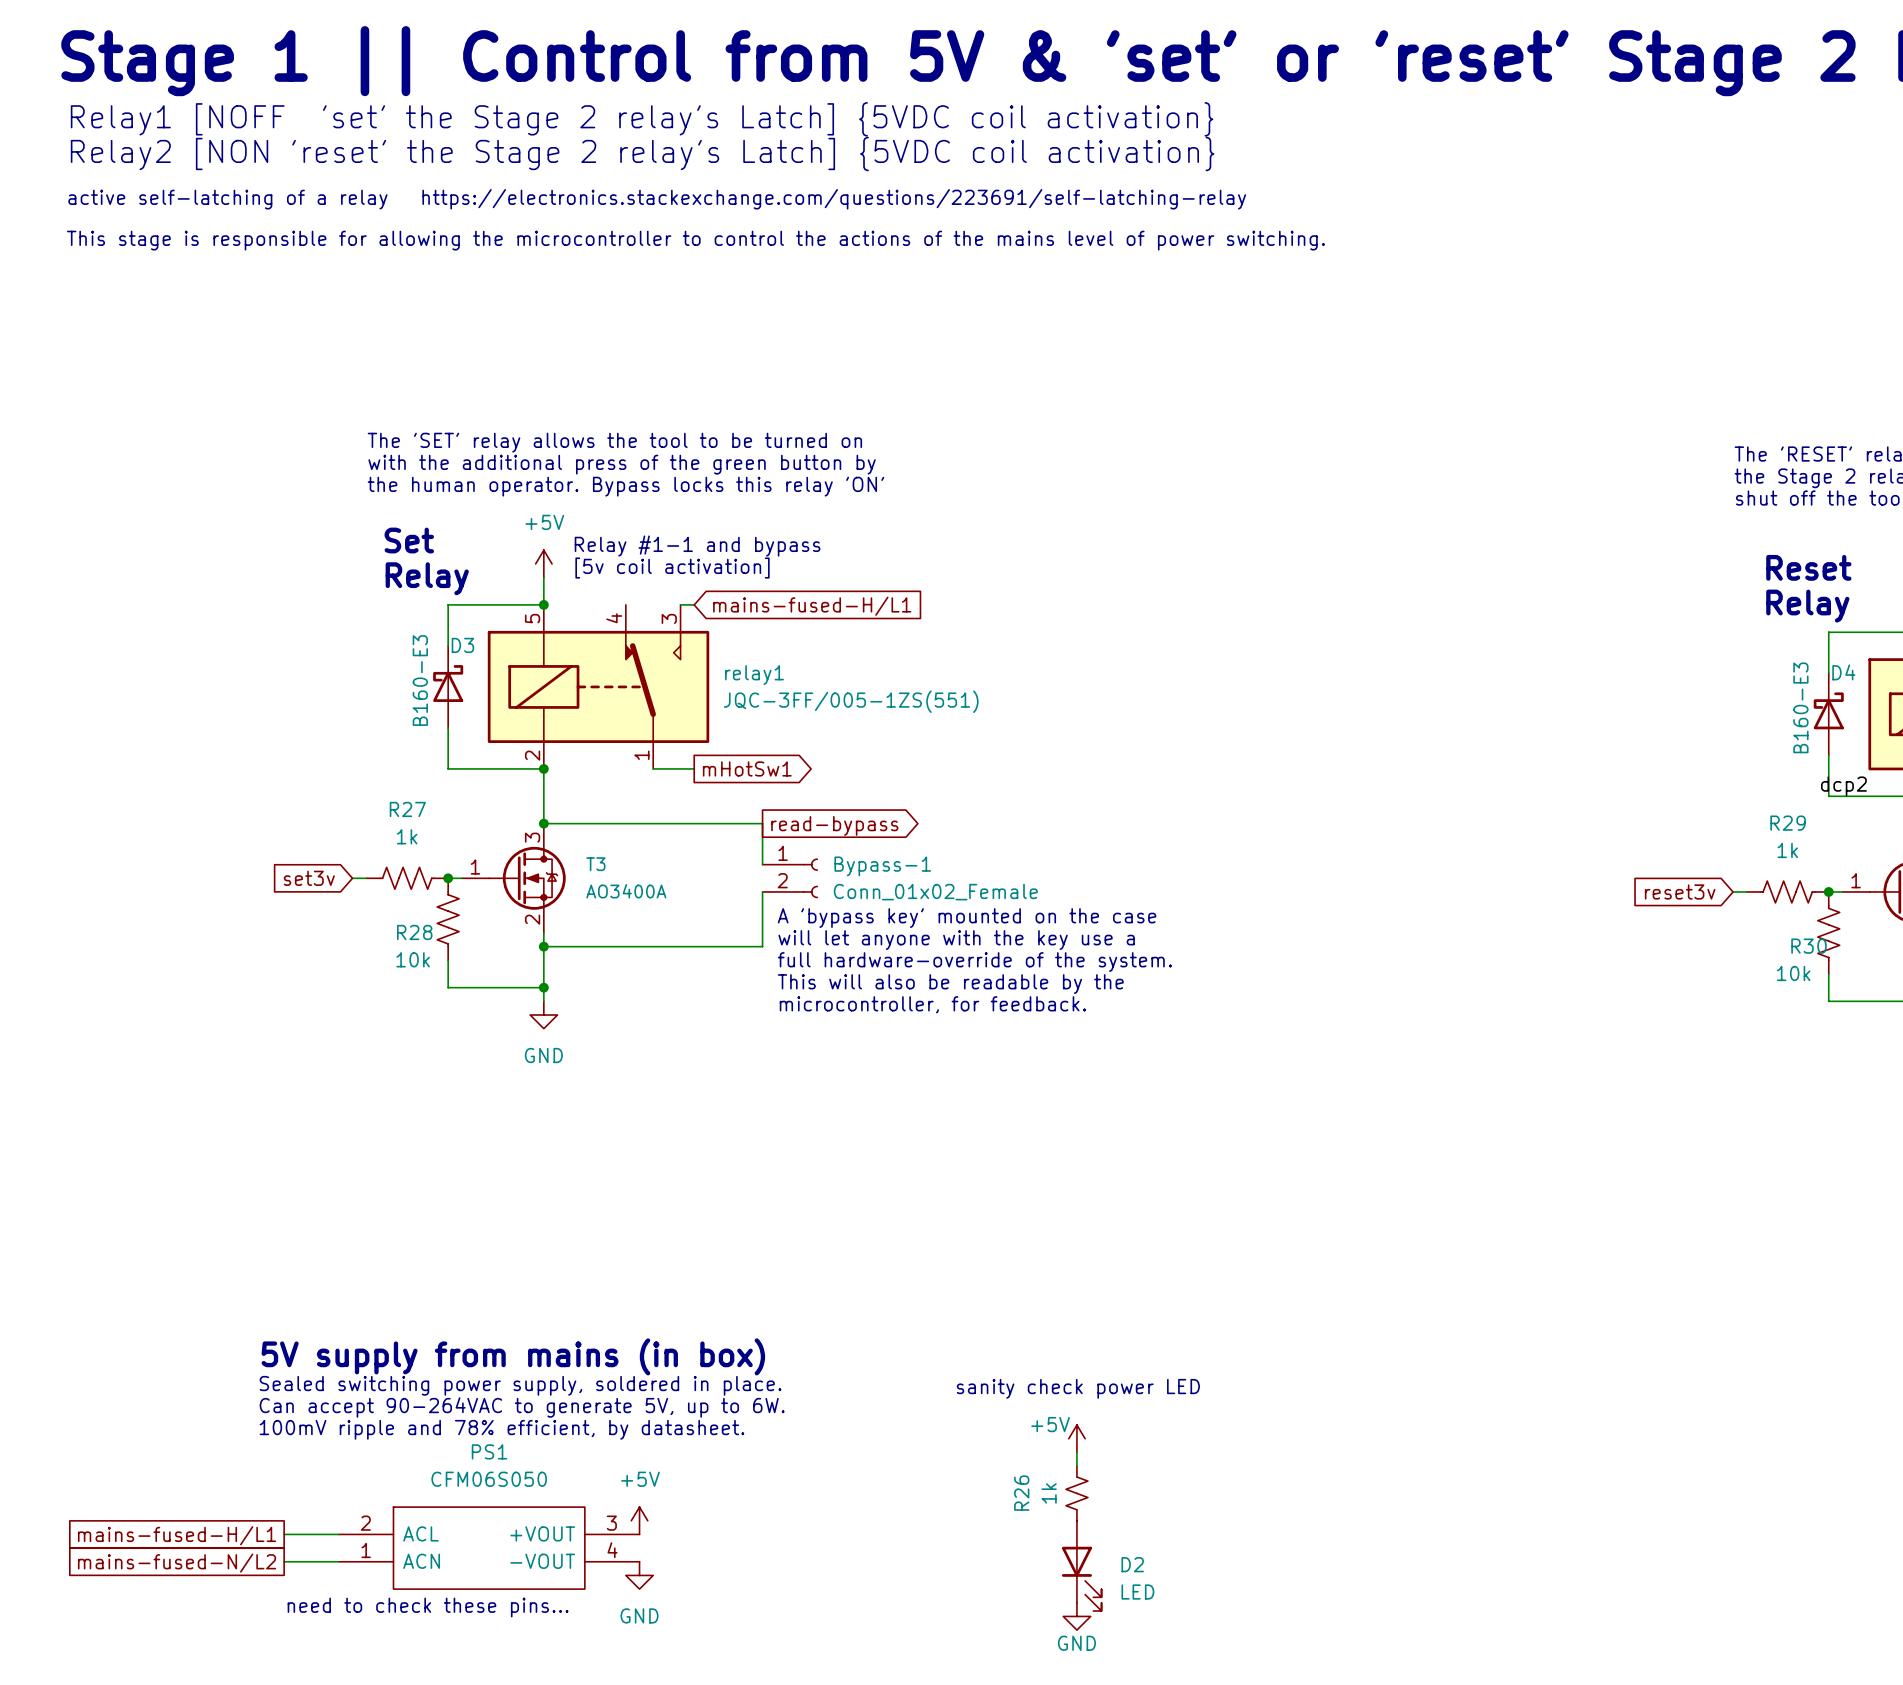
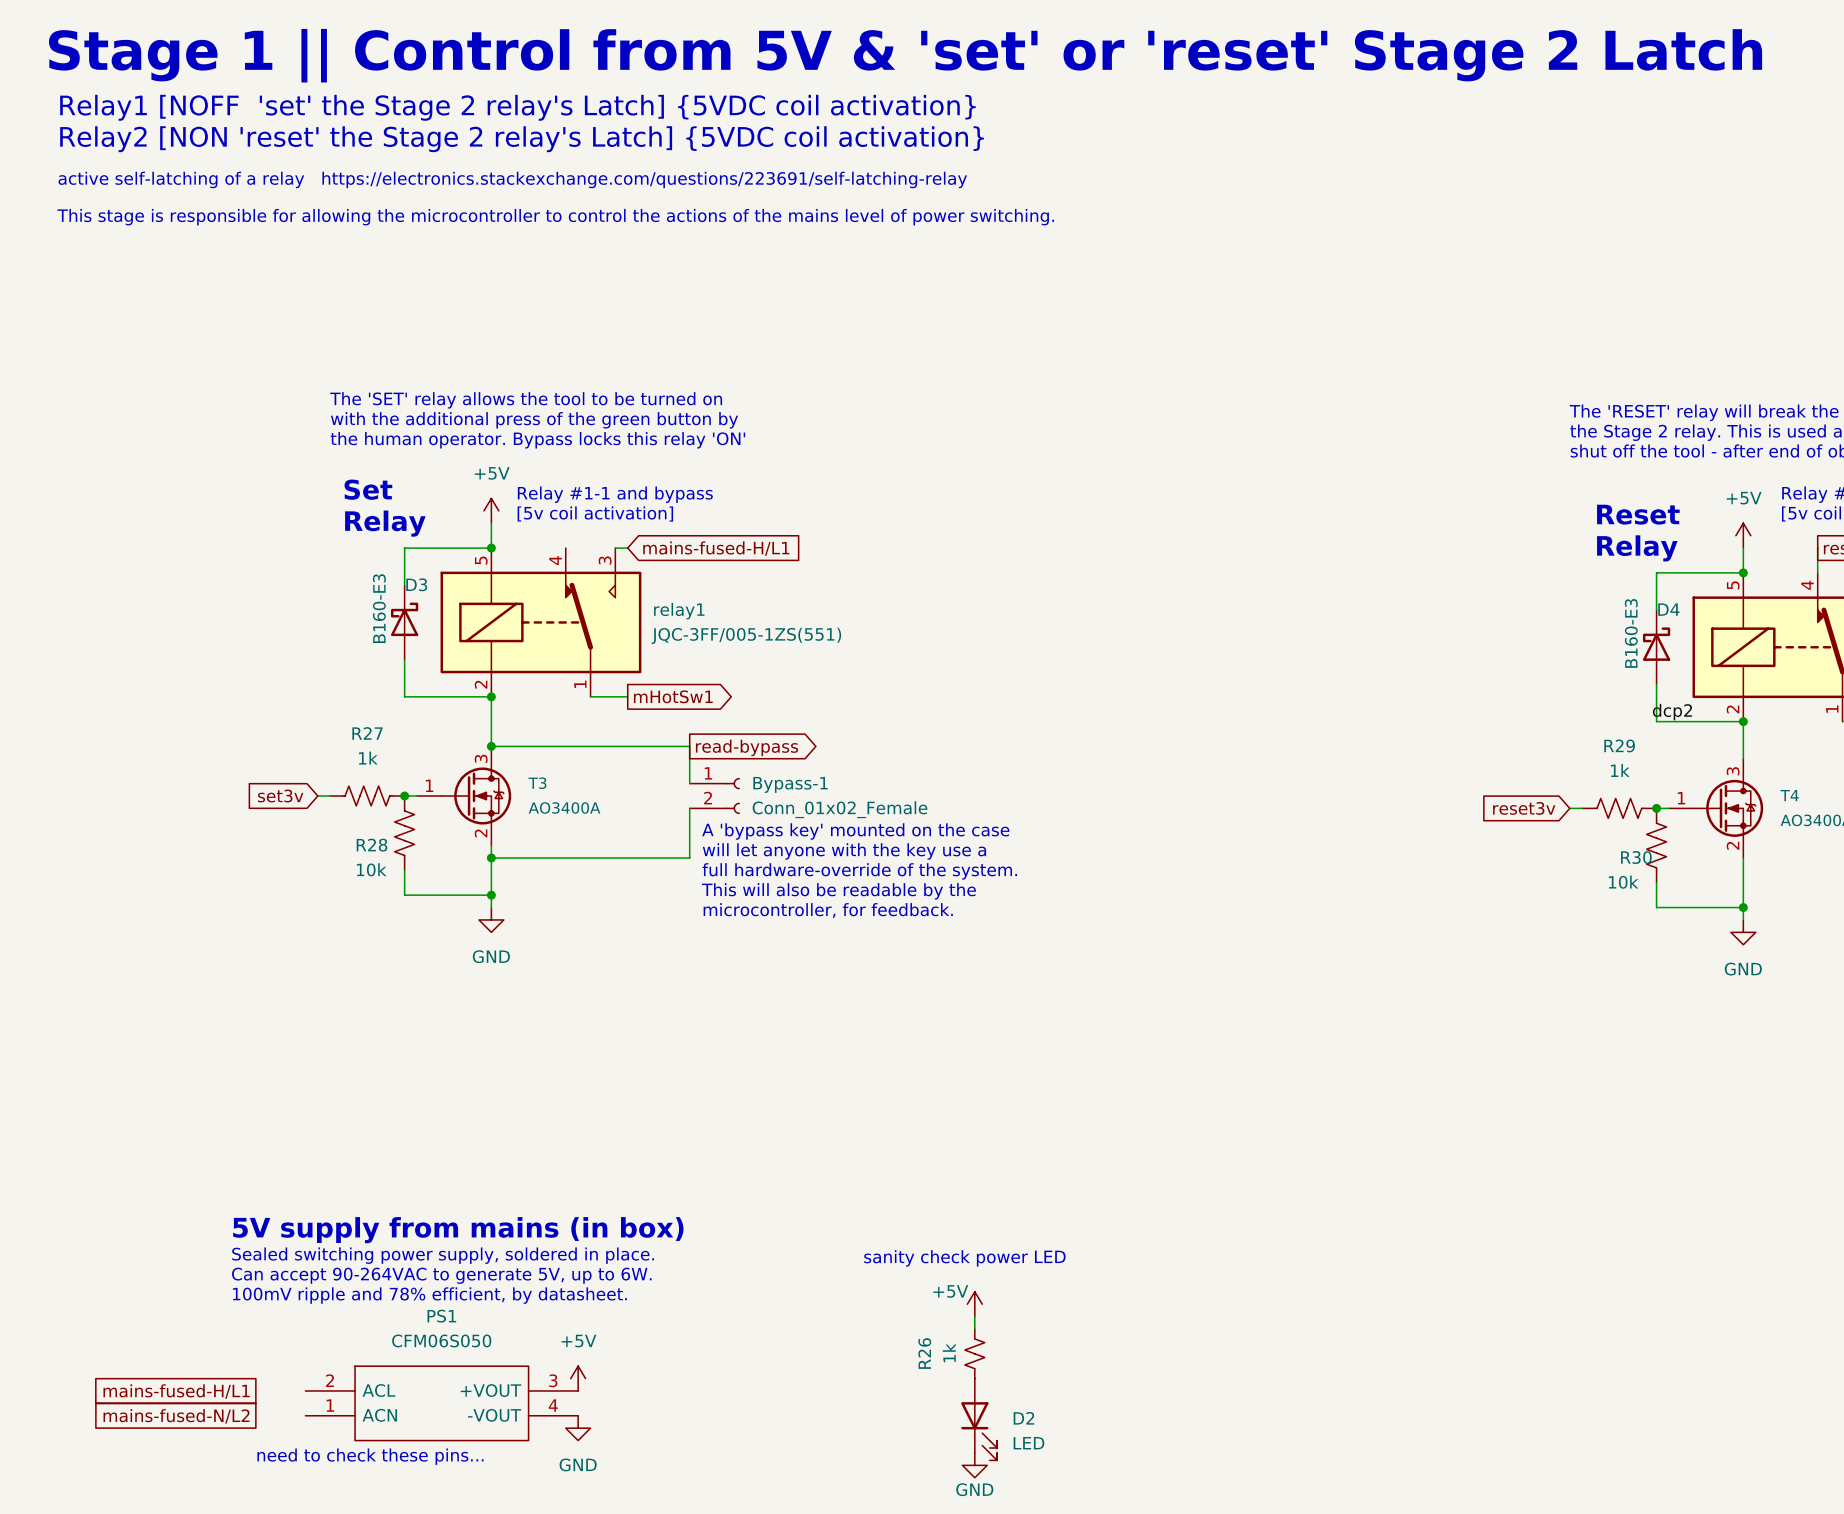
wire: (284, 1534) (338, 1534) -> none
wire: (284, 1561) (338, 1561) -> none

